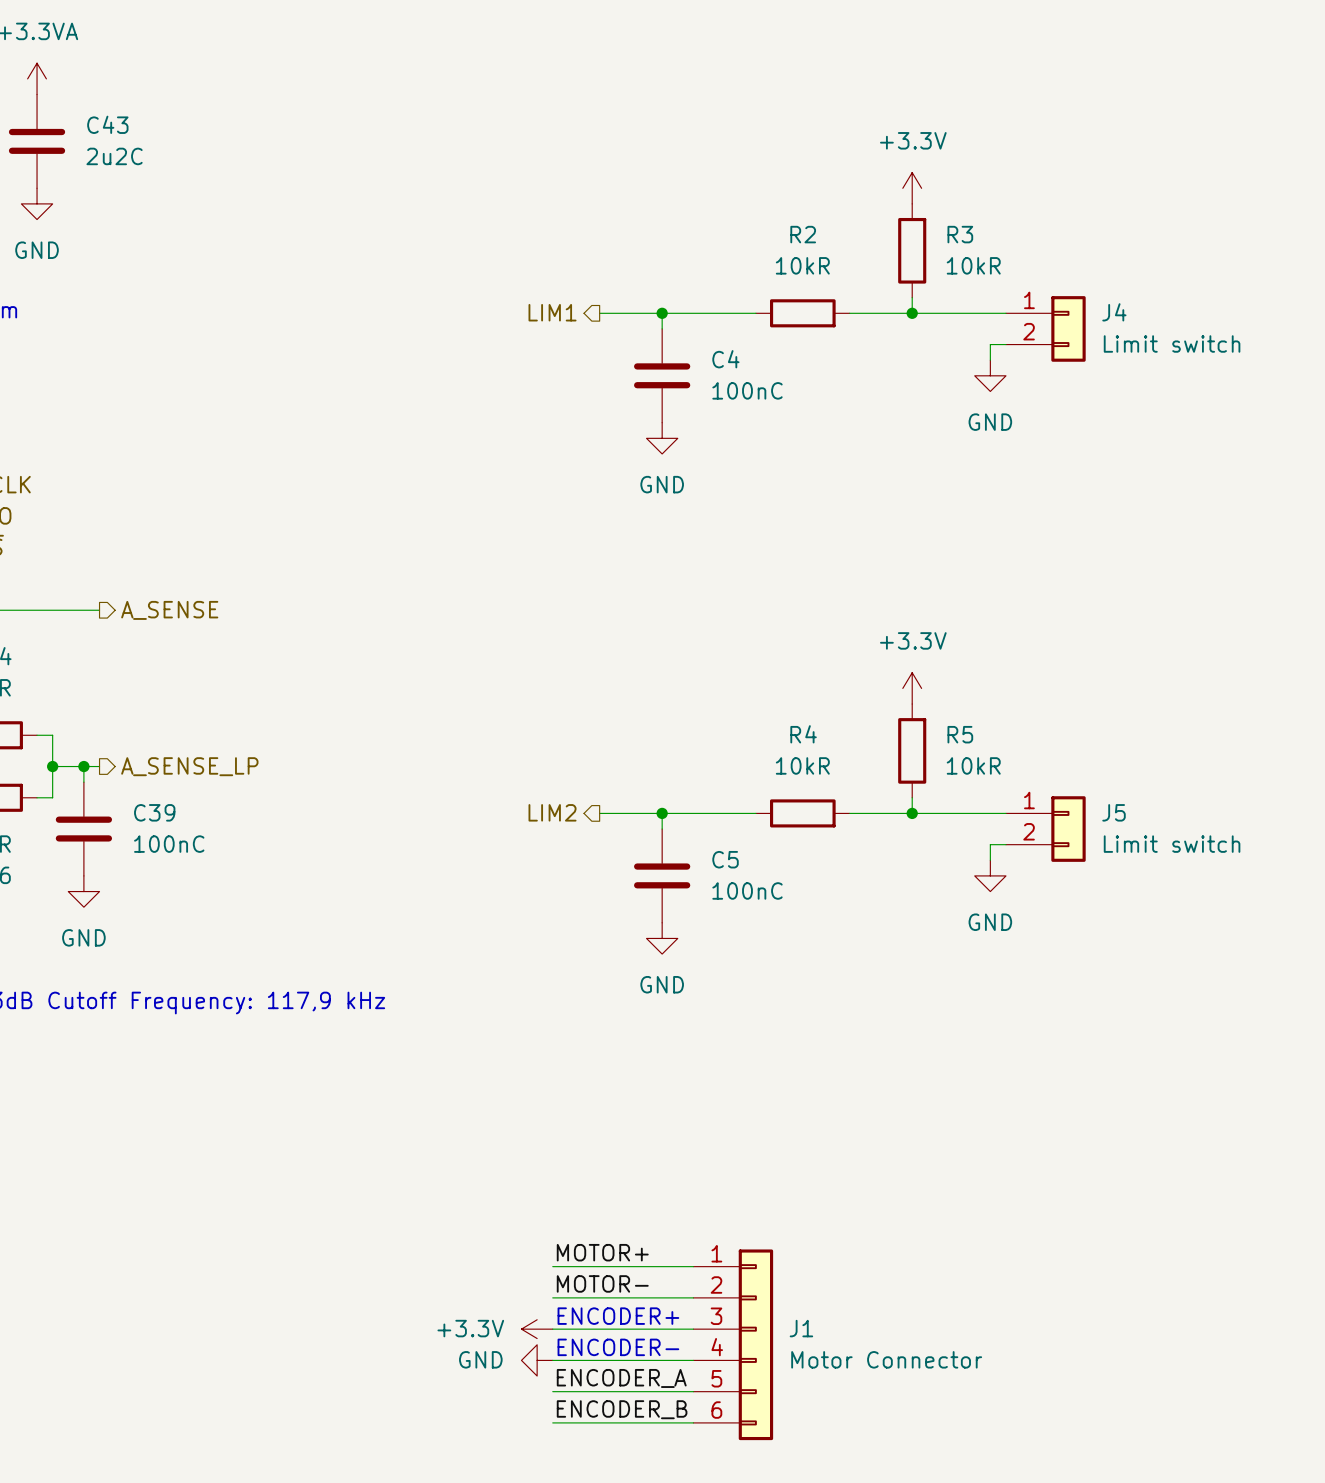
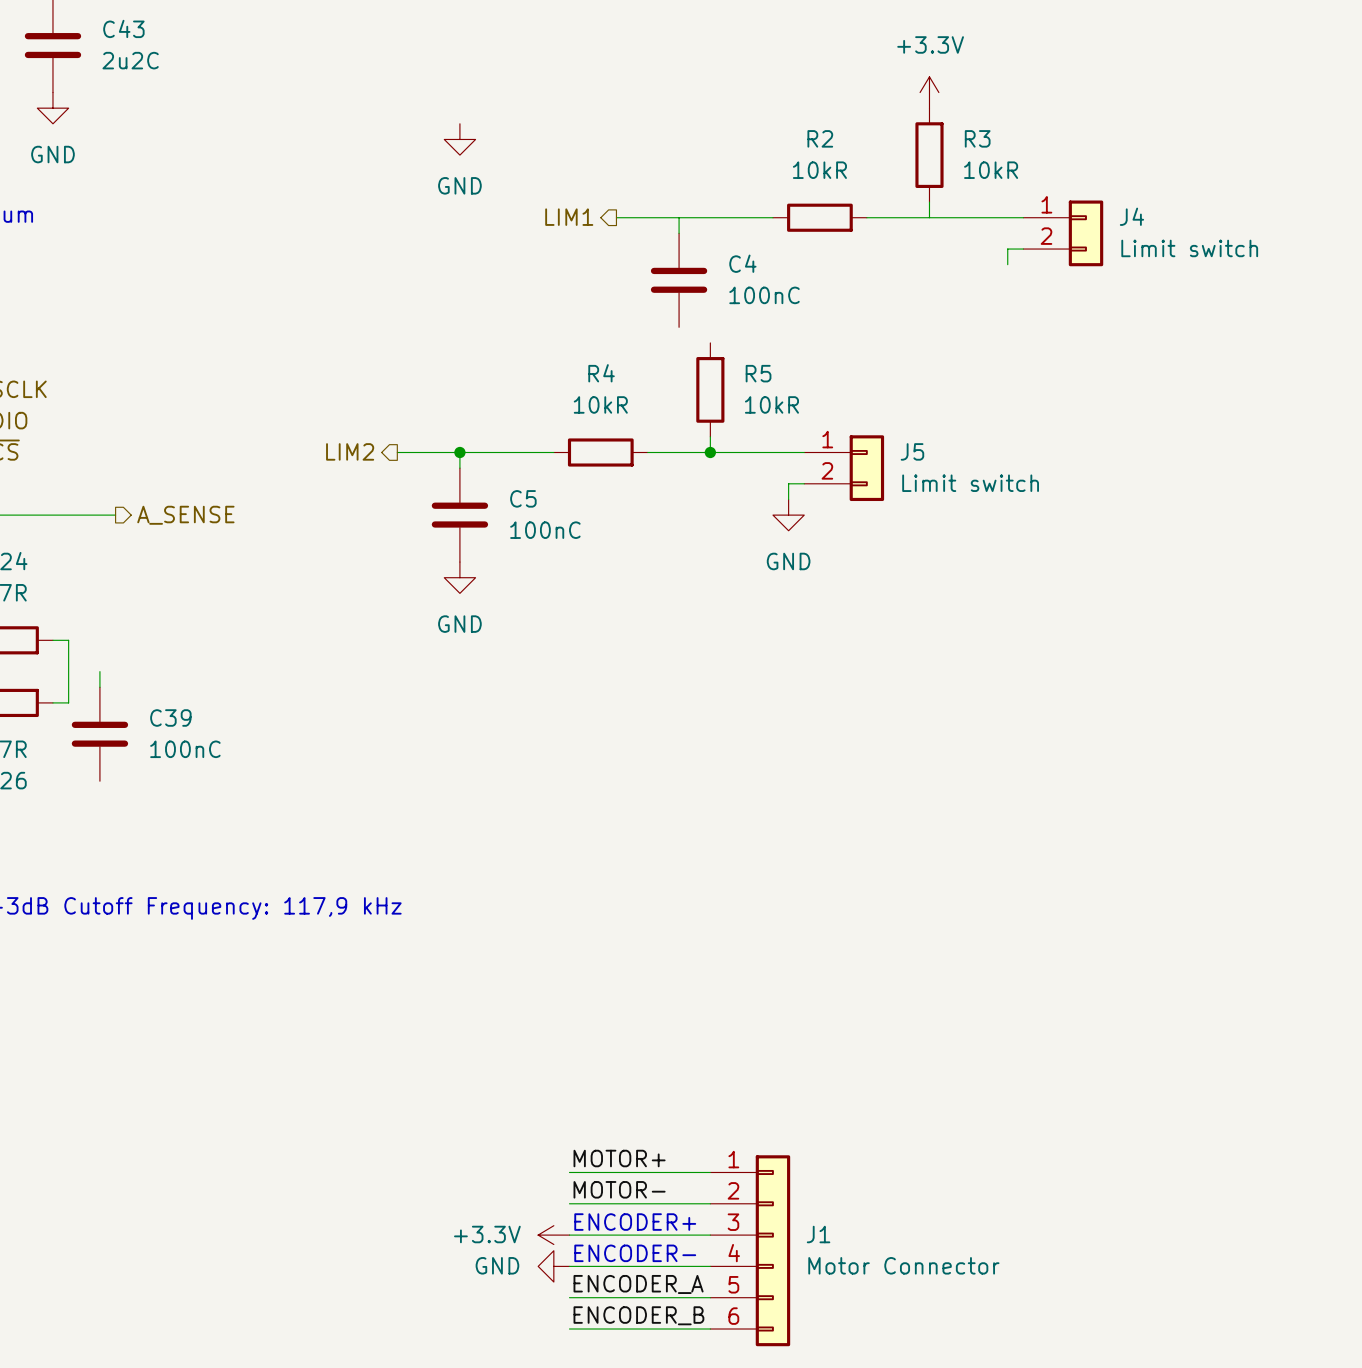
power symbol: none -> GND (459, 139)
junction: (662, 313) -> none
junction: (912, 313) -> none
power symbol: GND (990, 375) -> none
power symbol: GND (662, 438) -> none
hierarchical label: none -> LIM2 (350, 451)
wire: none -> (397, 452) (553, 452)
wire: none -> (459, 452) (459, 468)
junction: none -> (459, 452)
junction: none -> (710, 452)
wire: none -> (804, 483) (788, 483) (788, 499)
power symbol: none -> GND (788, 515)
power symbol: none -> GND (459, 577)
power symbol: +3.3V (912, 688) -> none
R5 position: (912, 750) -> (710, 389)
wire: (52, 766) (99, 766) -> none
junction: (52, 766) -> none
junction: (83, 766) -> none
hierarchical label: A_SENSE_LP (189, 766) -> none
wire: (912, 797) (912, 813) -> none
hierarchical label: LIM2 (552, 812) -> none
wire: (599, 813) (755, 813) -> (647, 452) (804, 452)
wire: (662, 813) (662, 829) -> (710, 436) (710, 452)
junction: (662, 813) -> none
R4 position: (802, 813) -> (600, 452)
wire: (849, 813) (1005, 813) -> none
junction: (912, 813) -> none
J5 position: (1045, 829) -> (844, 468)
wire: (1005, 844) (990, 844) (990, 860) -> none
C5 position: (662, 875) -> (459, 515)
power symbol: GND (990, 875) -> none
power symbol: GND (83, 891) -> none
power symbol: GND (662, 938) -> none

